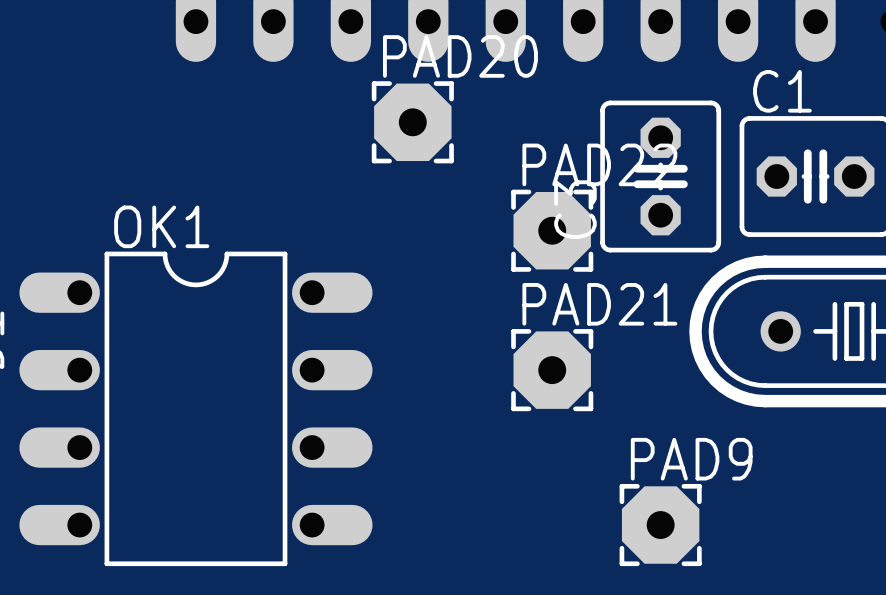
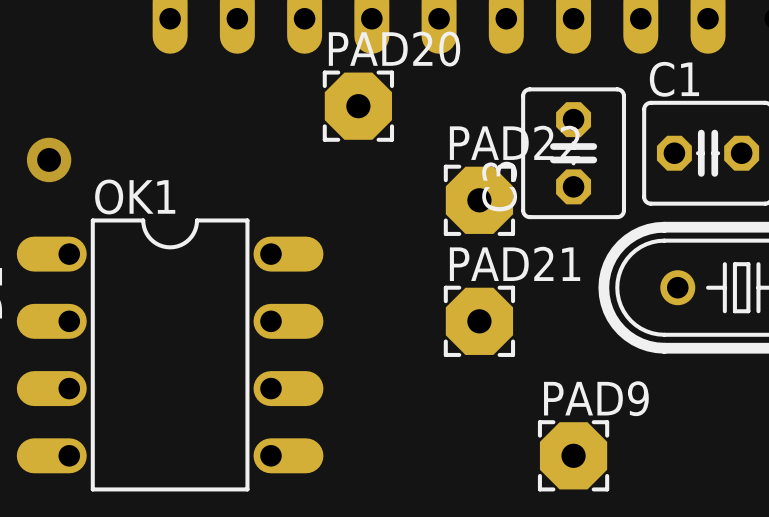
via: none -> (49, 159)

